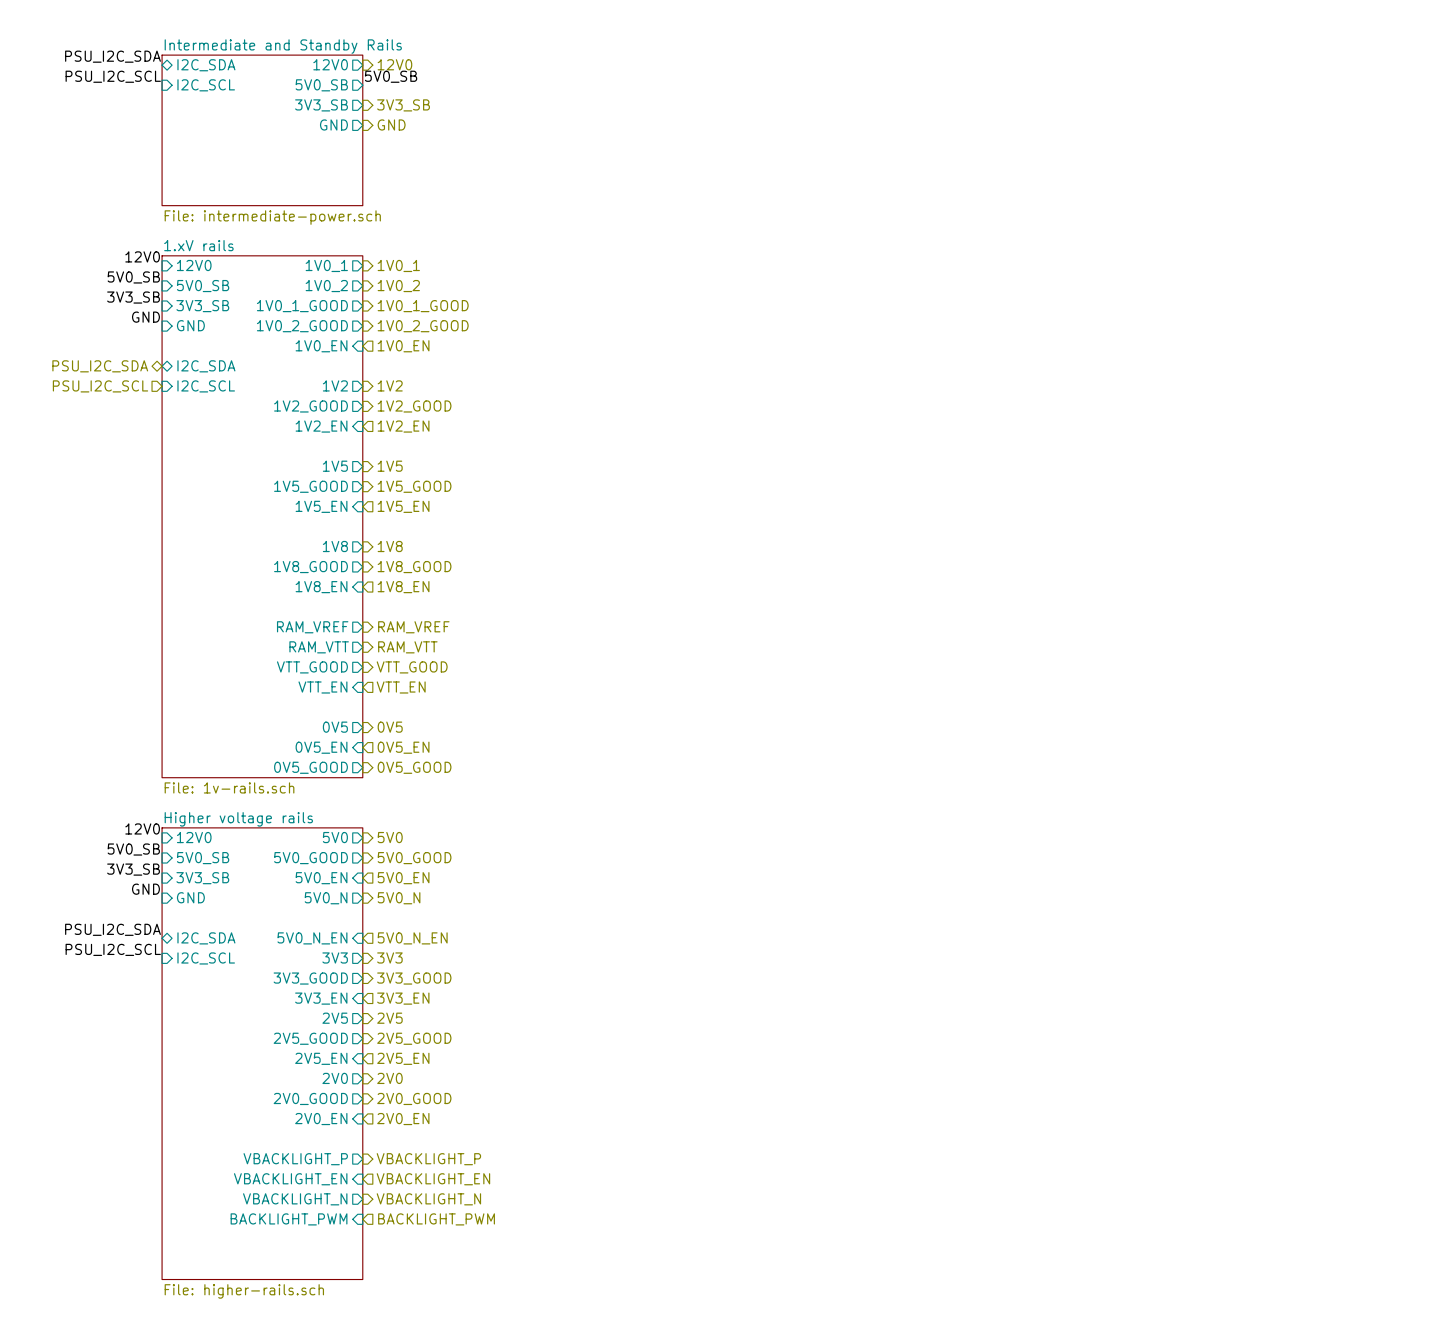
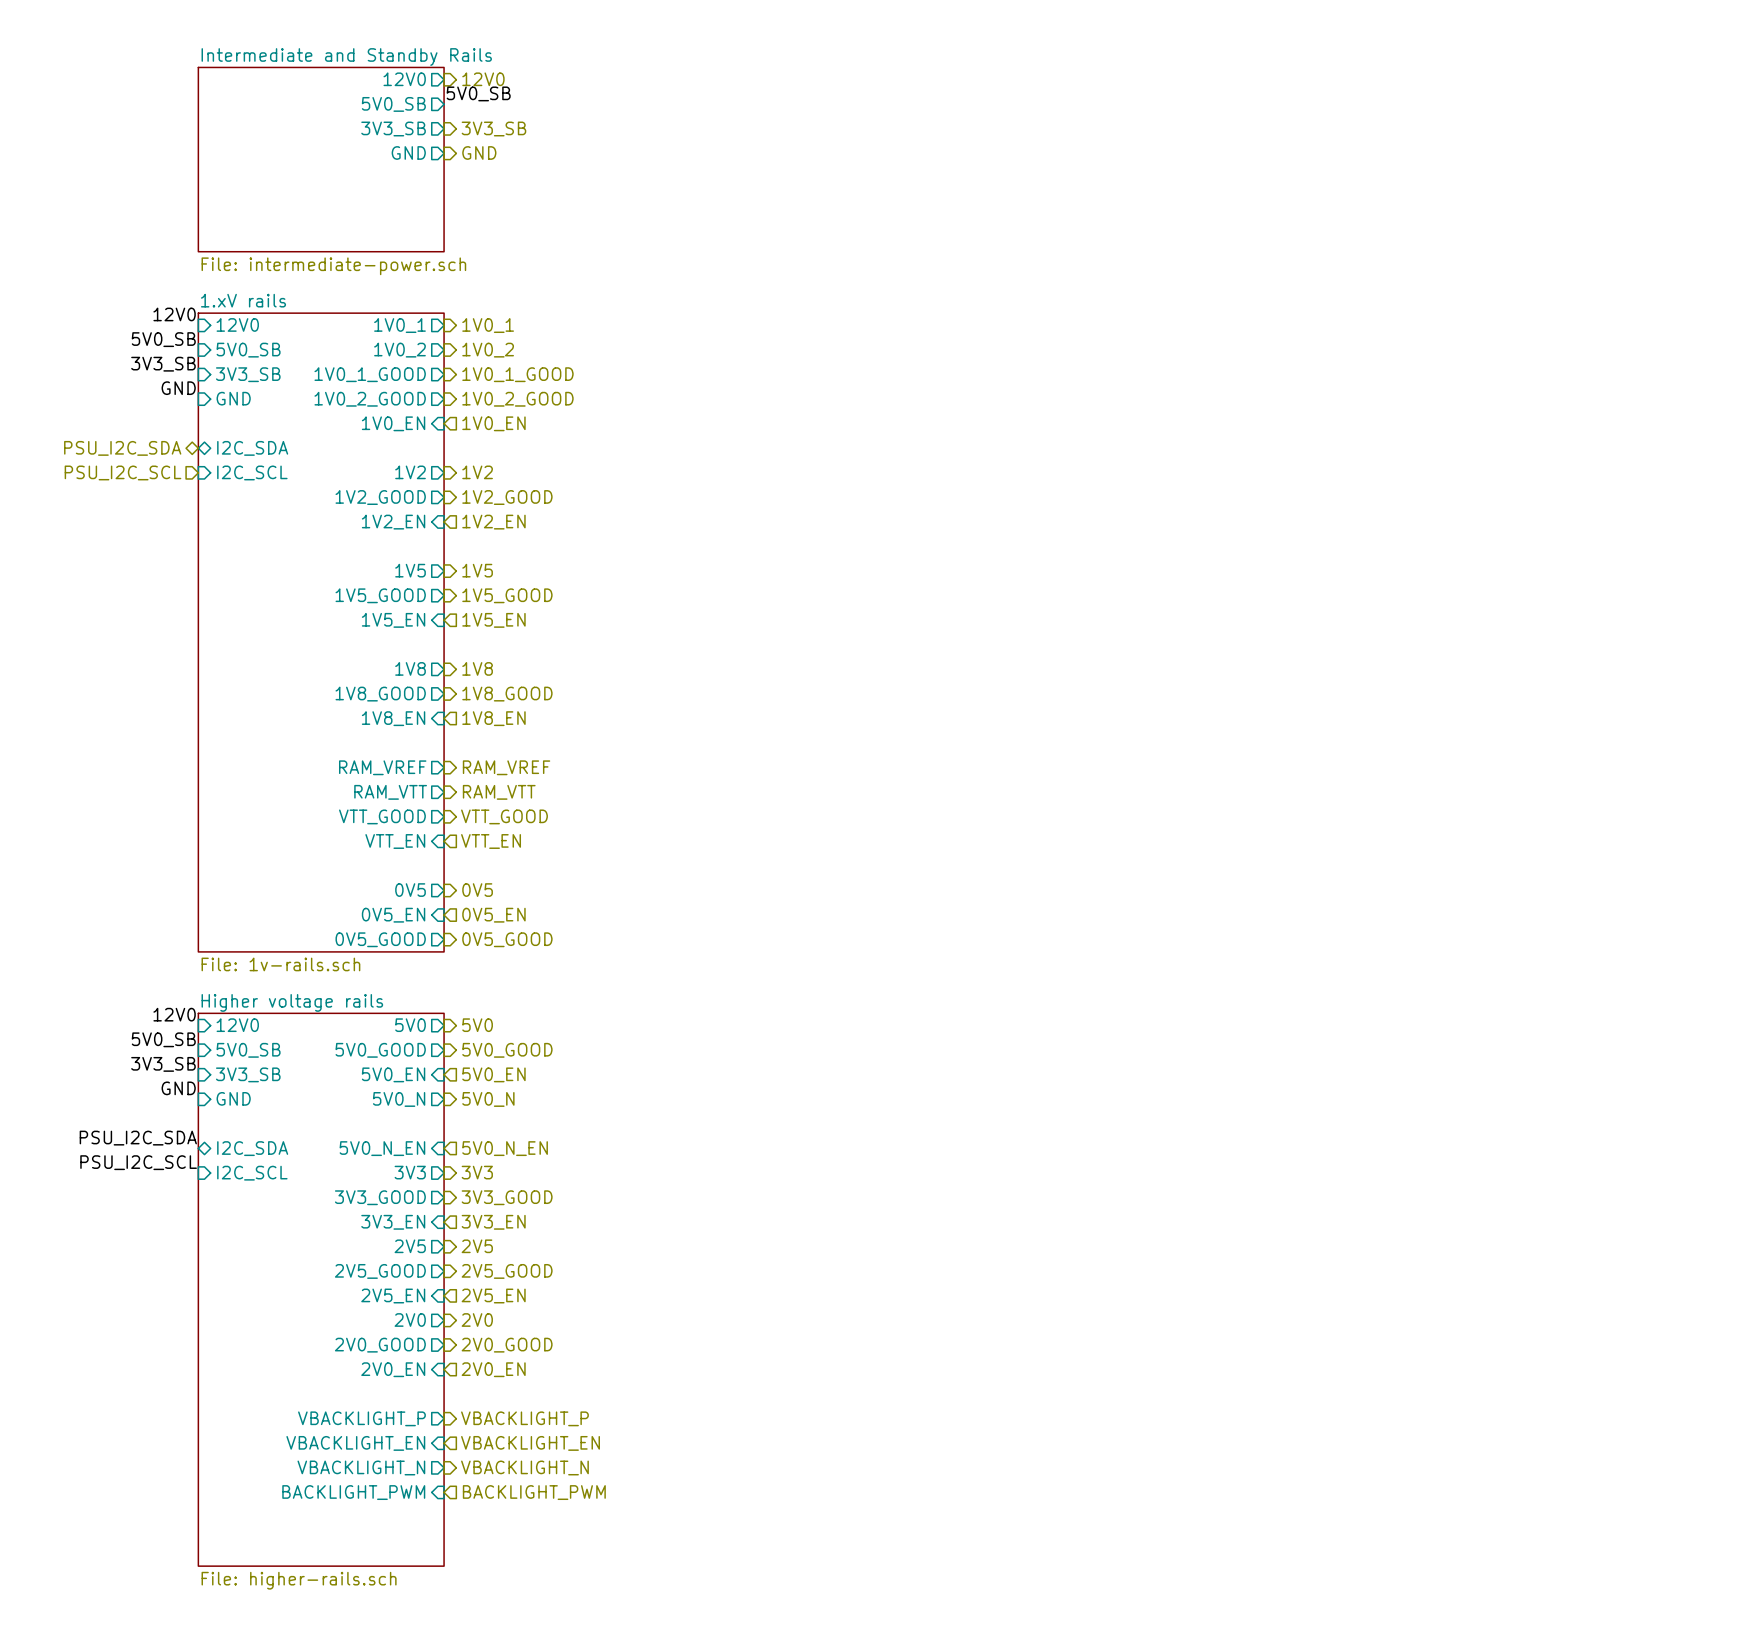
label: PSU_I2C_SDA (112, 56) -> none
sheet pin: I2C_SDA (206, 65) -> none
label: PSU_I2C_SCL (113, 76) -> none
sheet pin: I2C_SCL (206, 85) -> none

